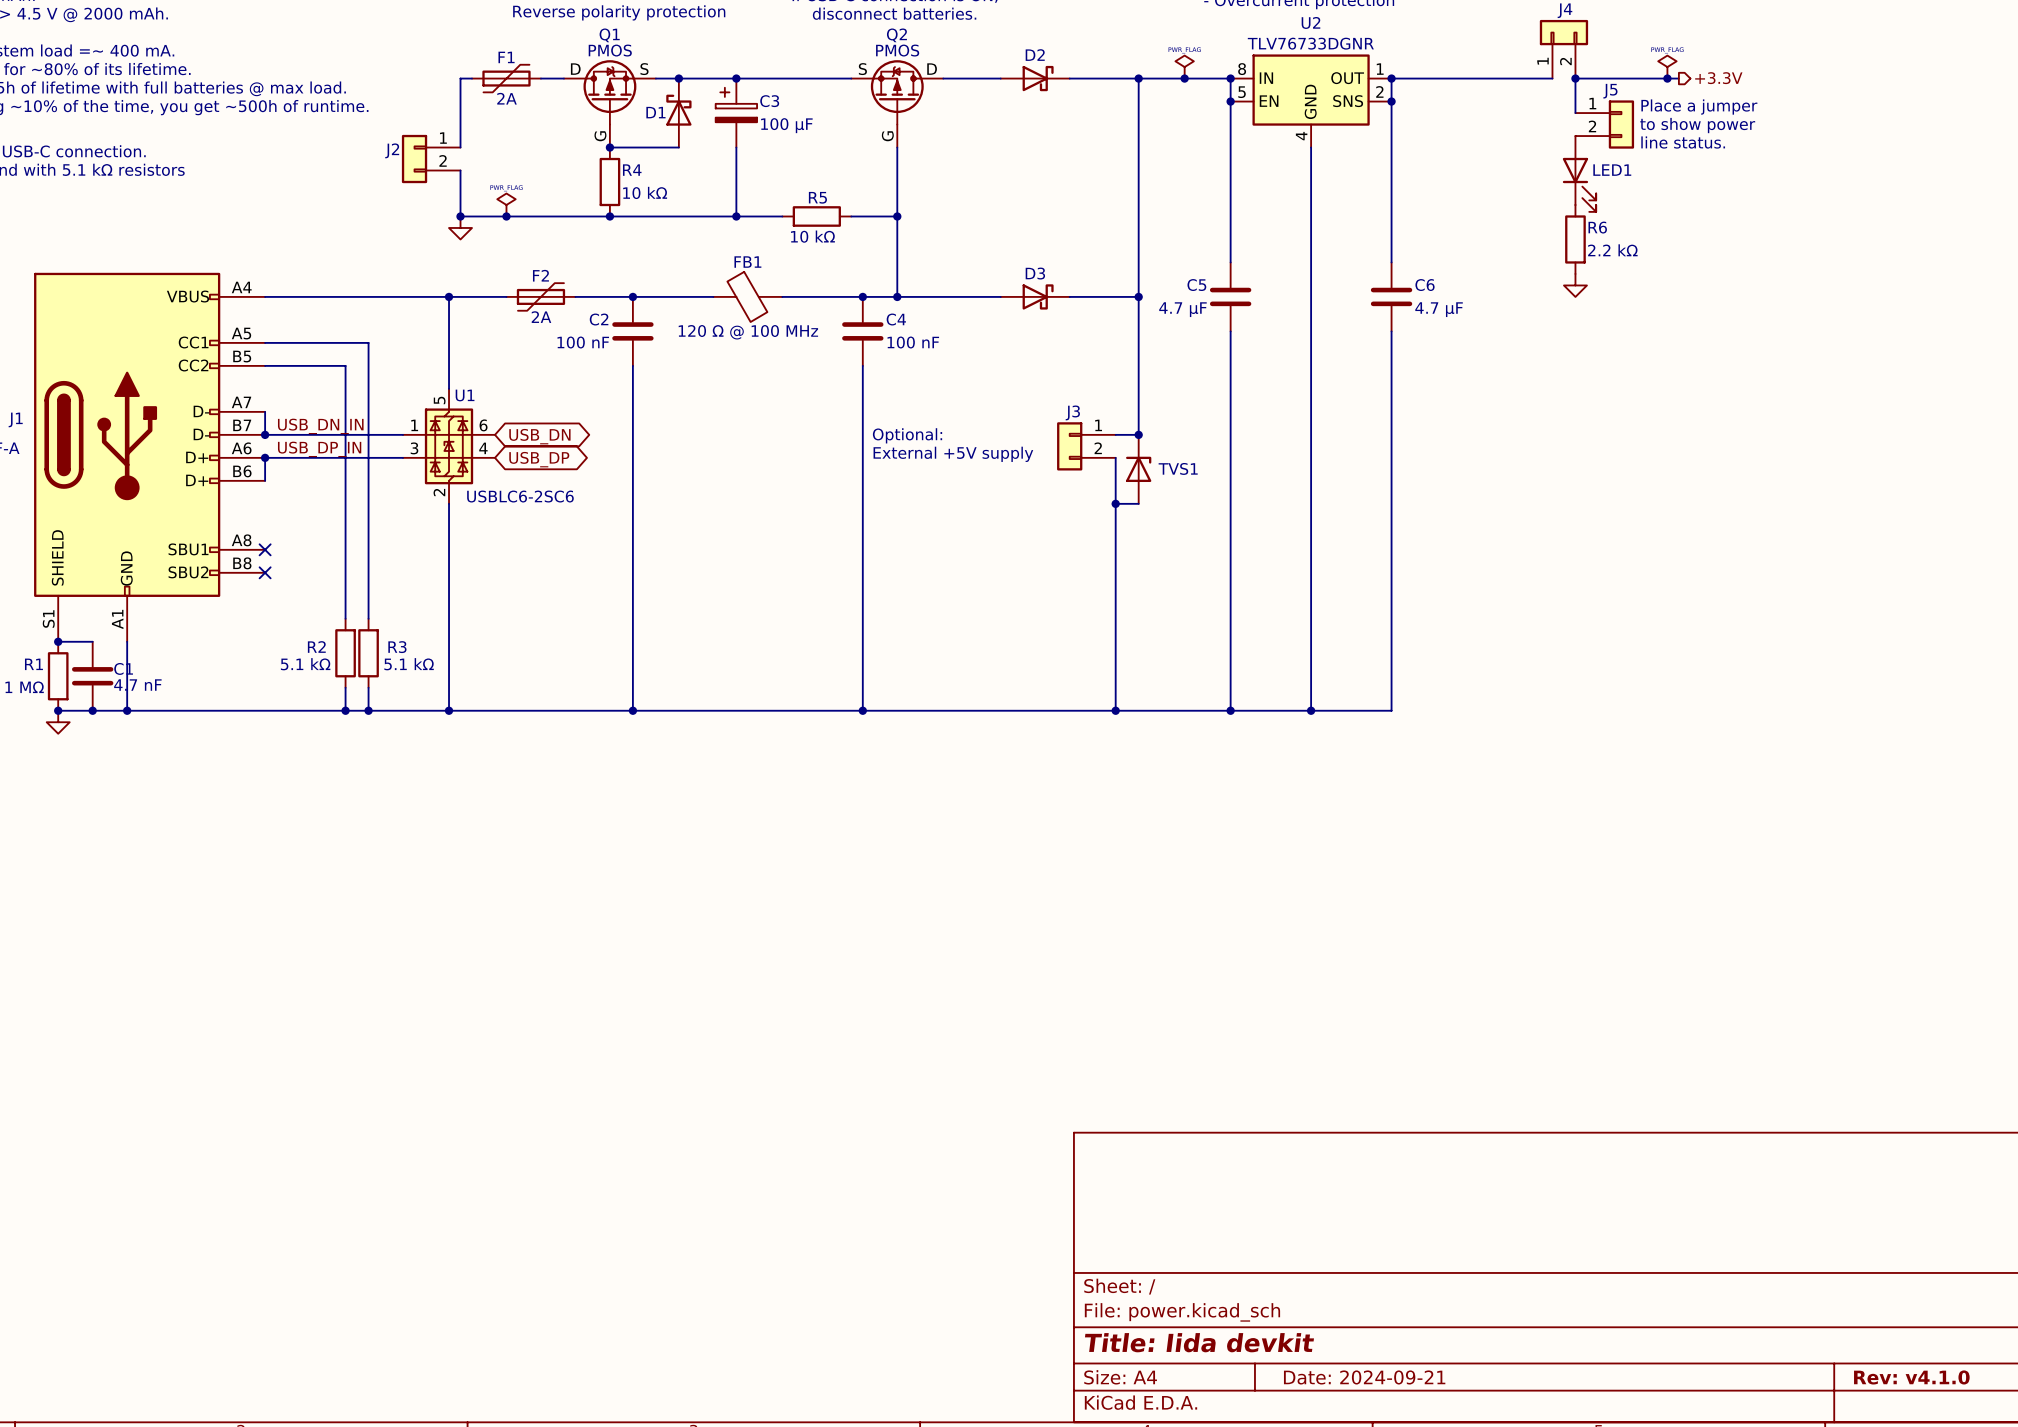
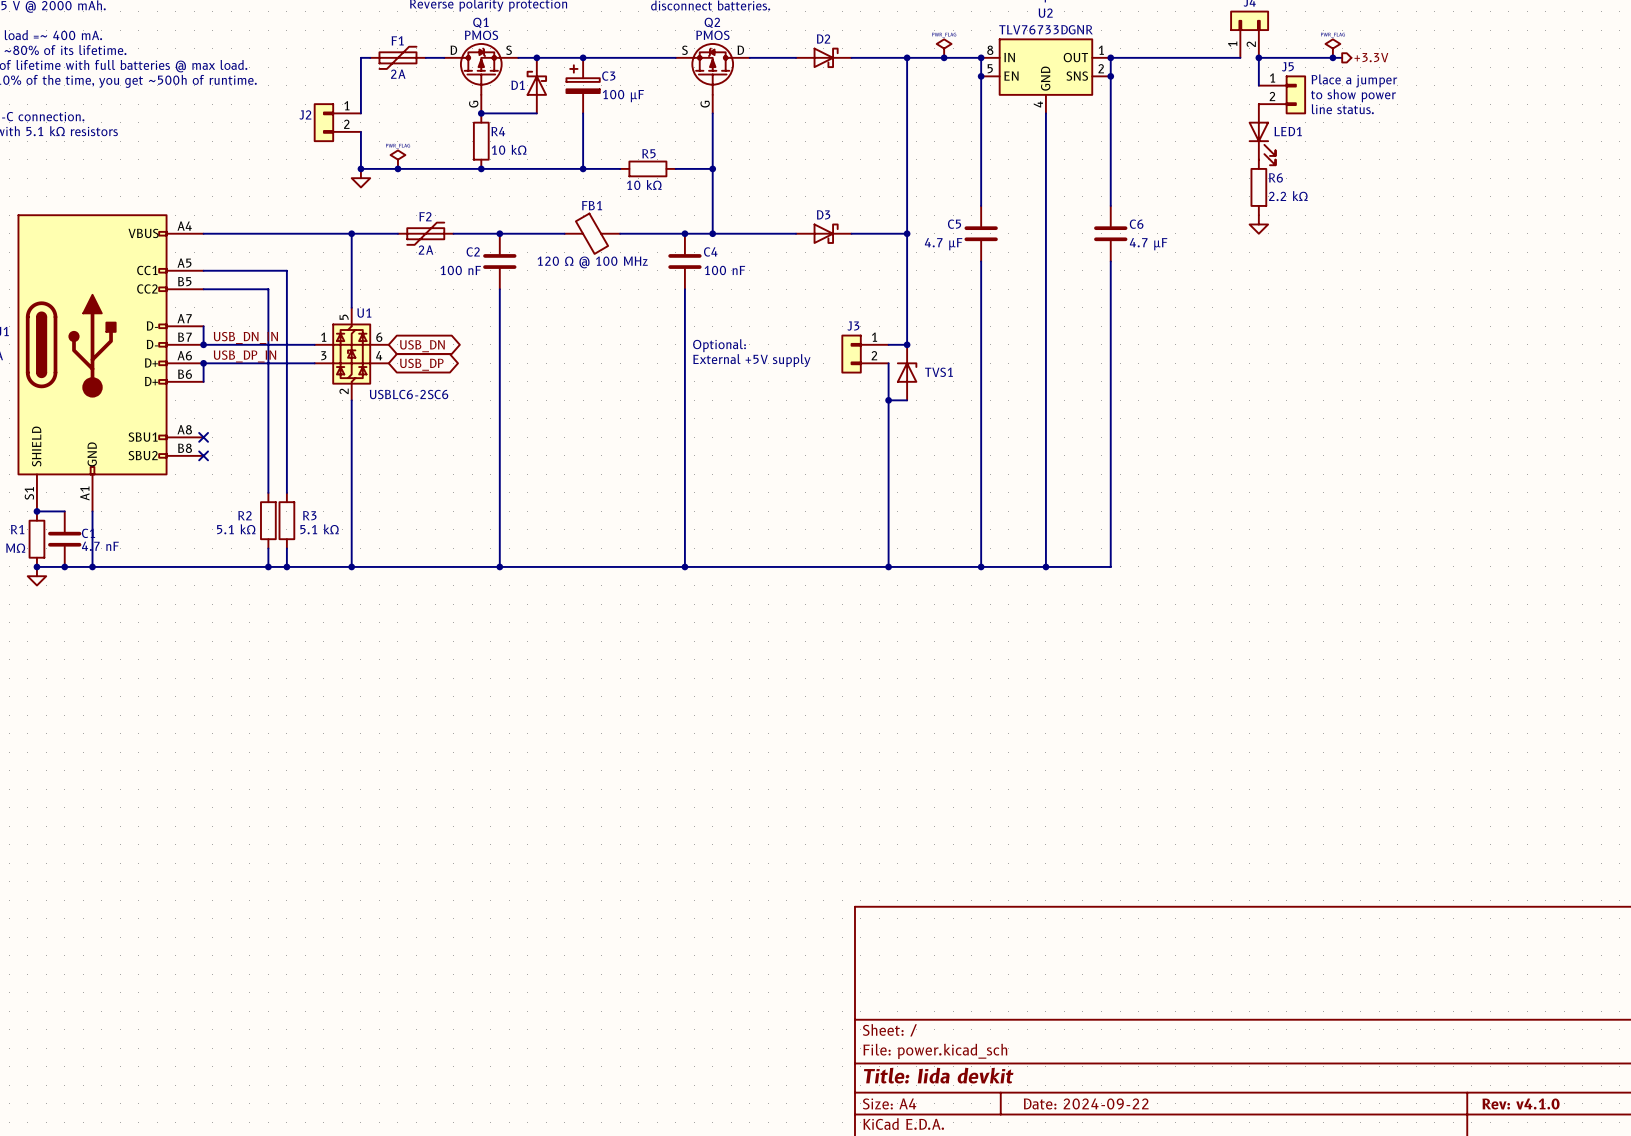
title block: Date: 2024-09-21 (1364, 1377) -> Date: 2024-09-22 (1086, 1103)

